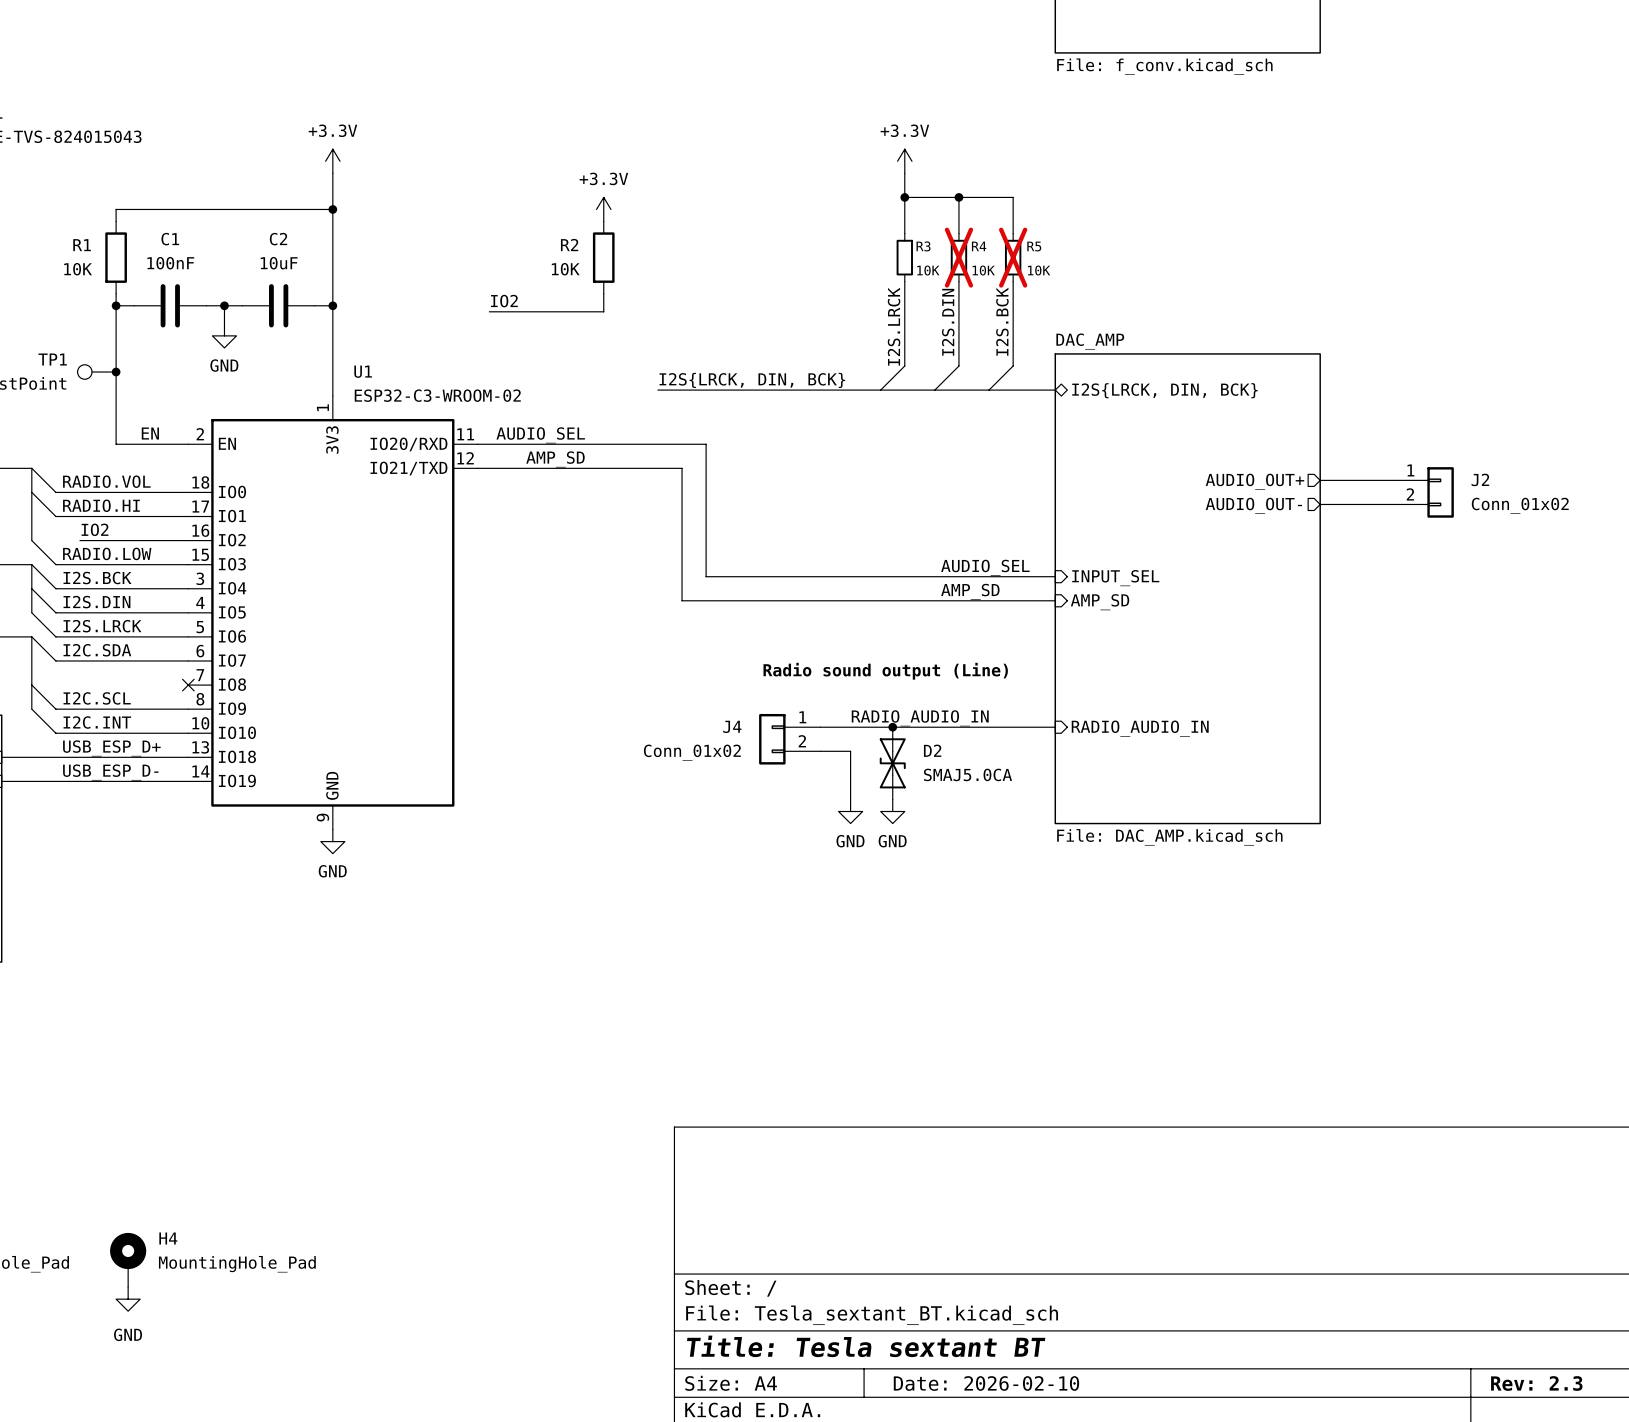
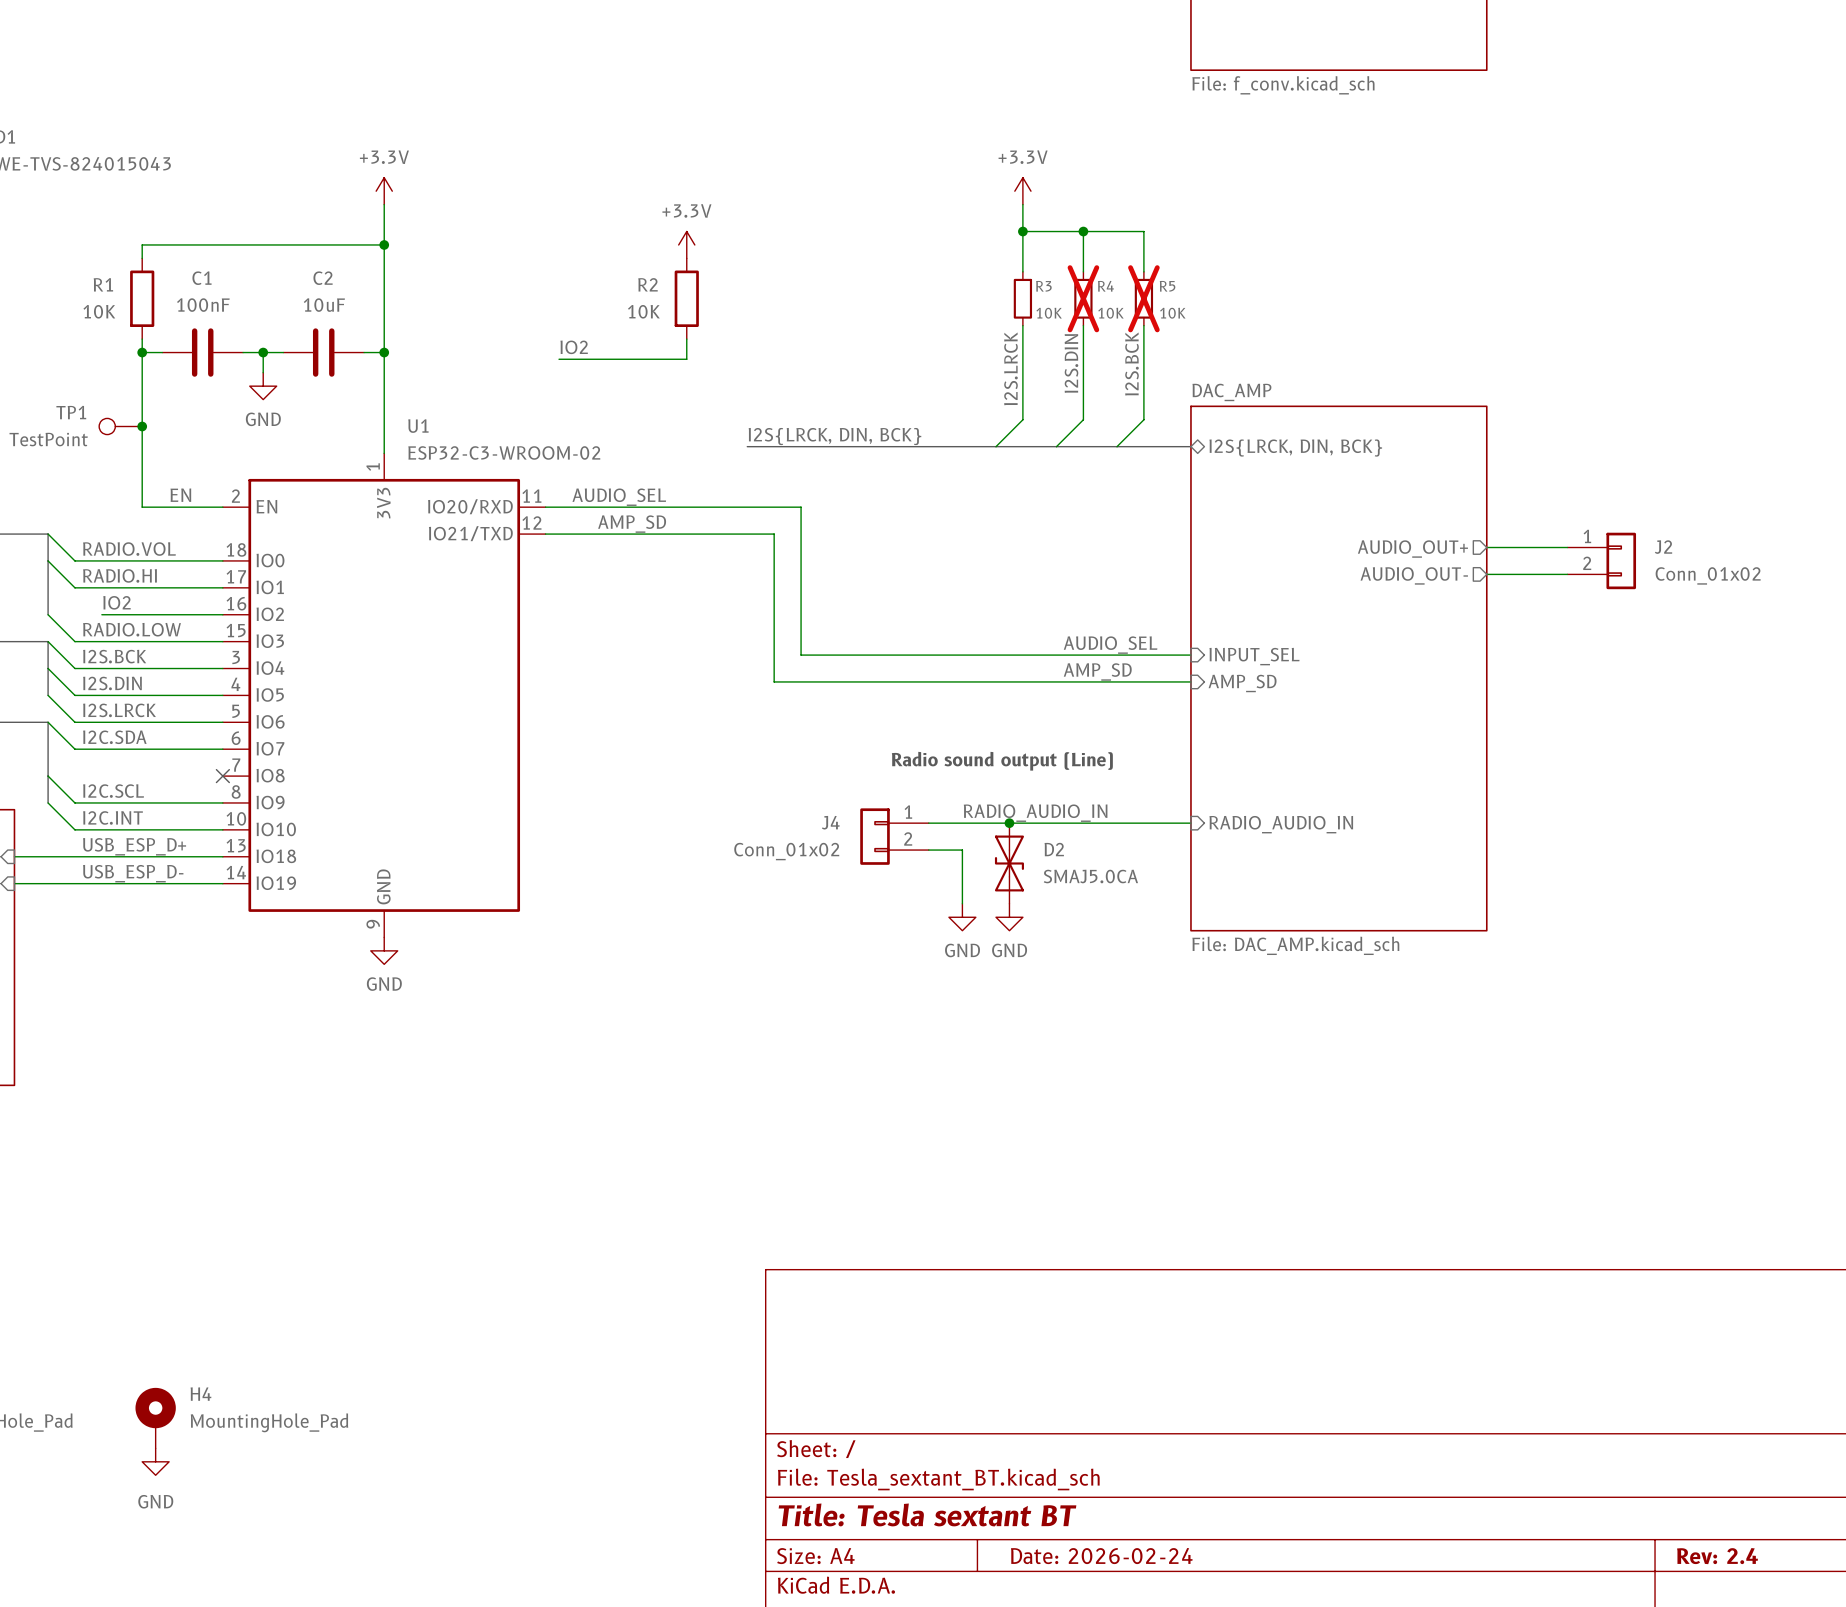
title block: Date: 2026-02-10 (986, 1383) -> Date: 2026-02-24 (1101, 1556)
title block: Rev: 2.3 (1536, 1383) -> Rev: 2.4 (1717, 1556)

